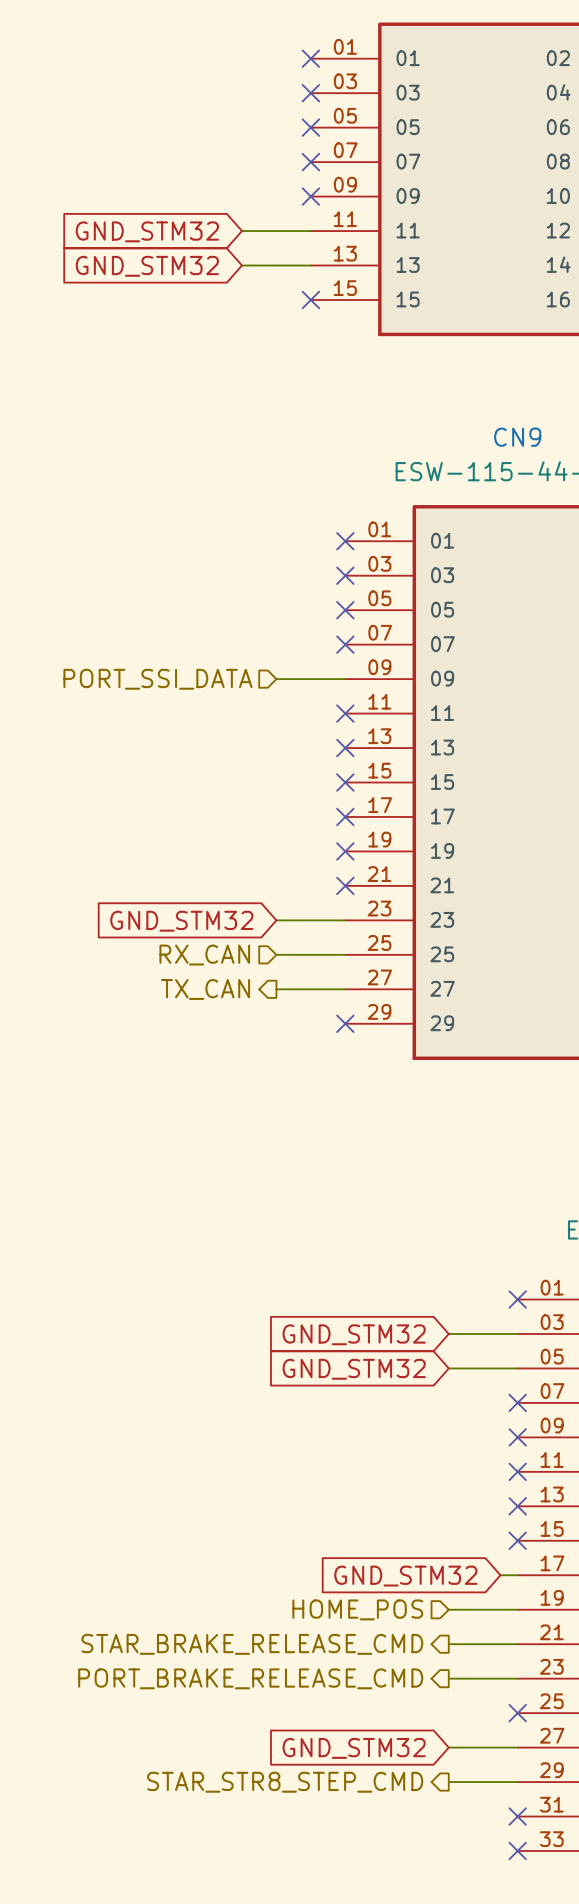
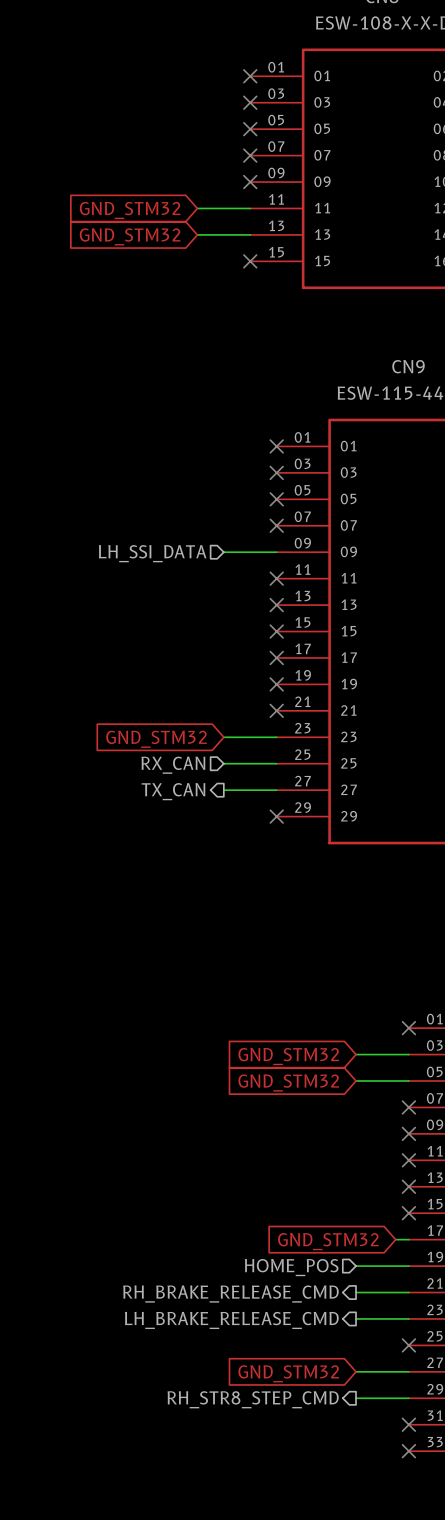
hierarchical label: PORT_SSI_DATA (157, 679) -> LH_SSI_DATA (152, 553)
hierarchical label: STAR_BRAKE_RELEASE_CMD (252, 1644) -> RH_BRAKE_RELEASE_CMD (230, 1294)
hierarchical label: PORT_BRAKE_RELEASE_CMD (250, 1678) -> LH_BRAKE_RELEASE_CMD (231, 1320)
hierarchical label: STAR_STR8_STEP_CMD (285, 1782) -> RH_STR8_STEP_CMD (253, 1399)

